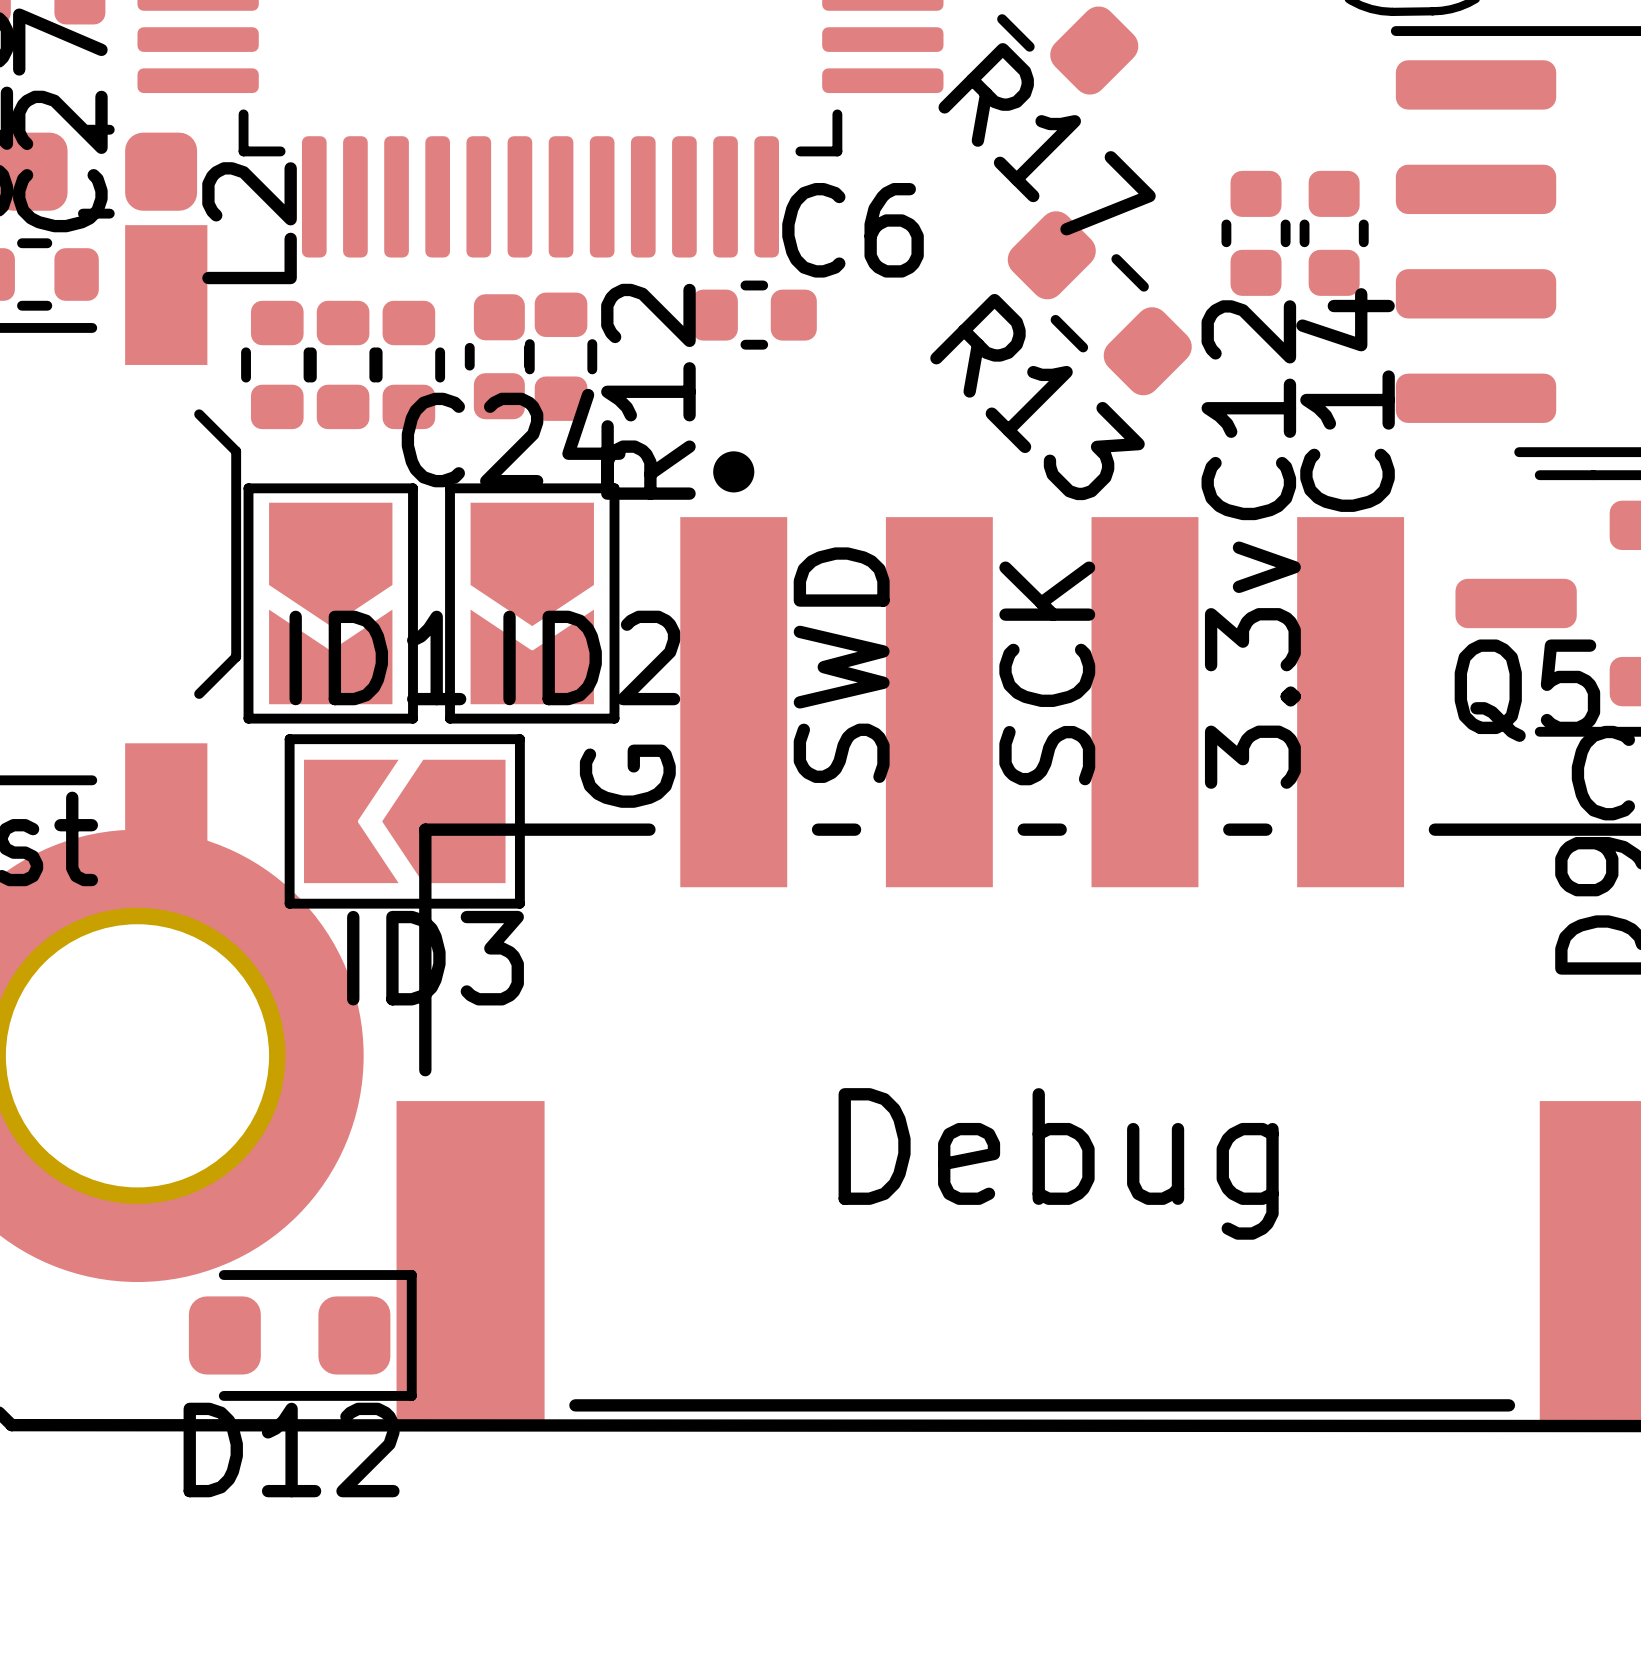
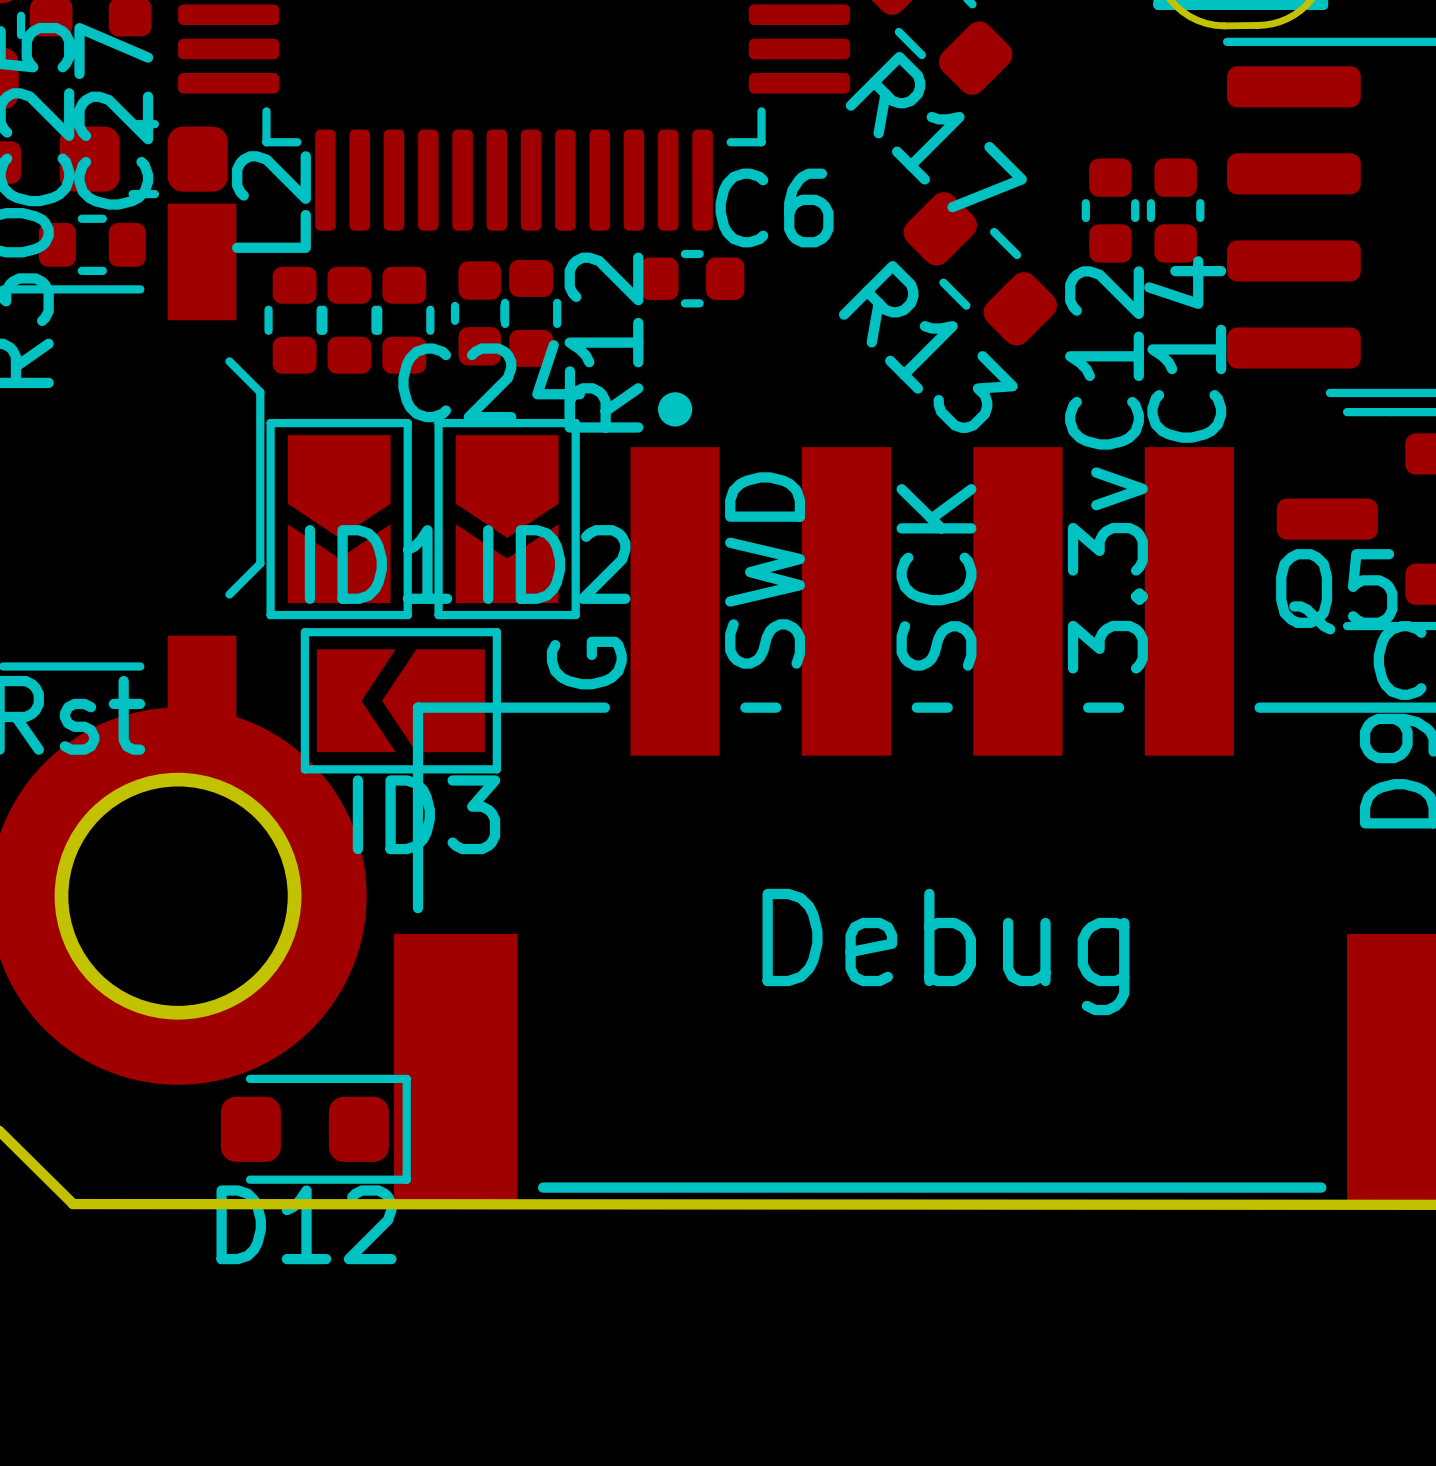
part value position: Debug (1058, 1163) -> Debug (945, 952)

